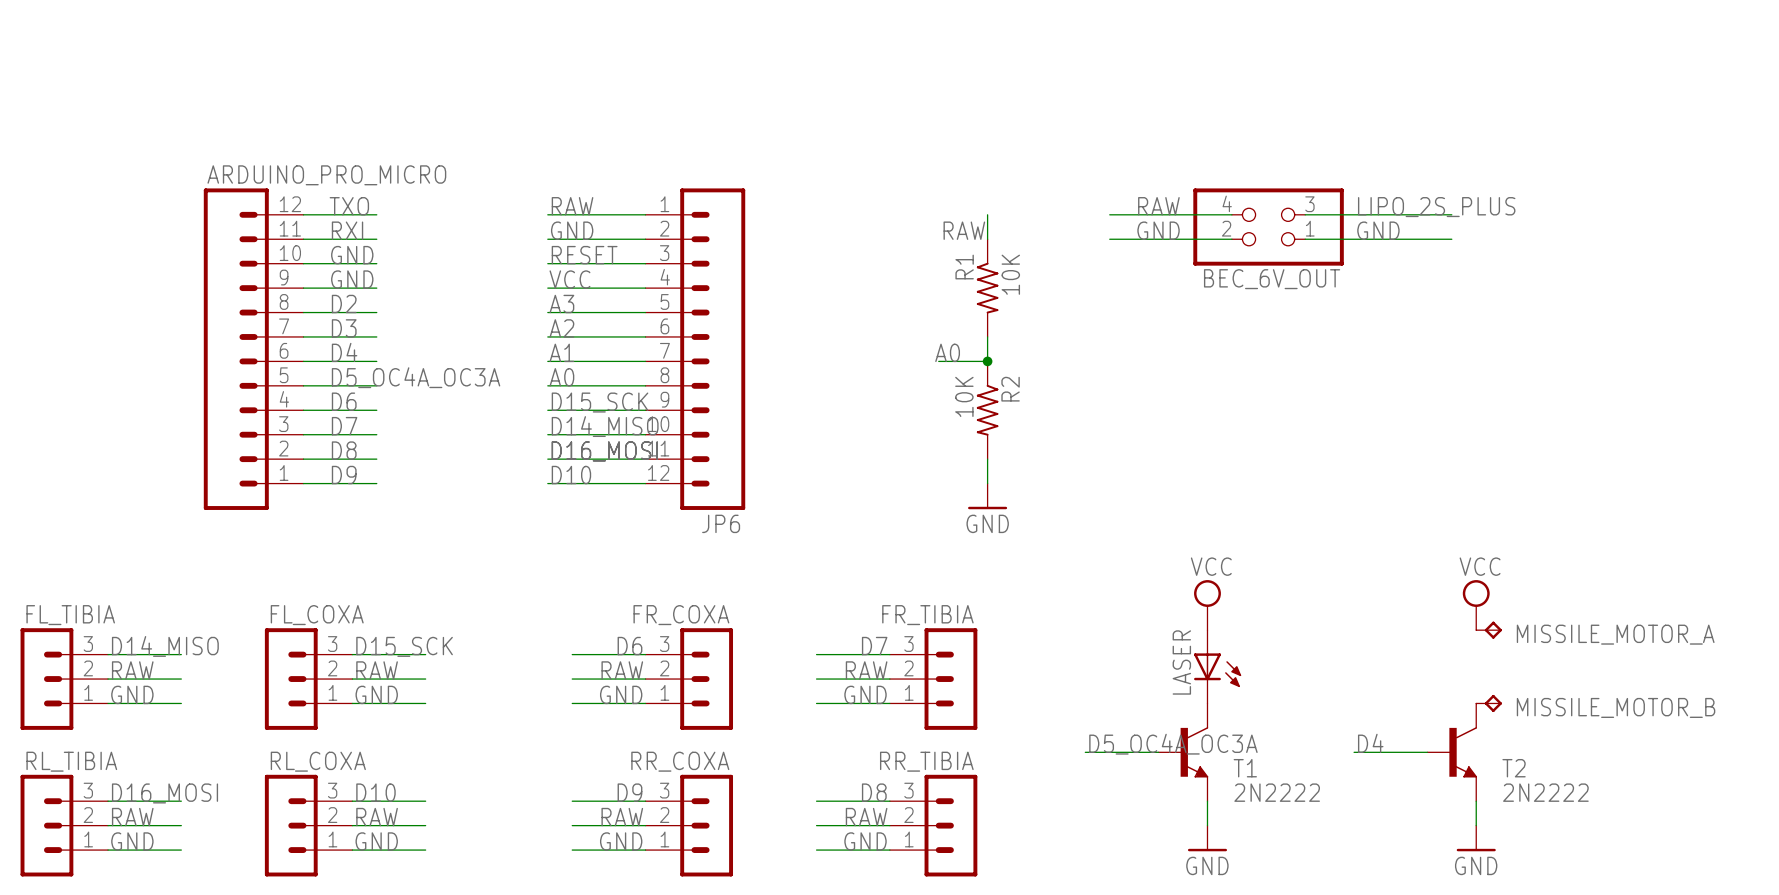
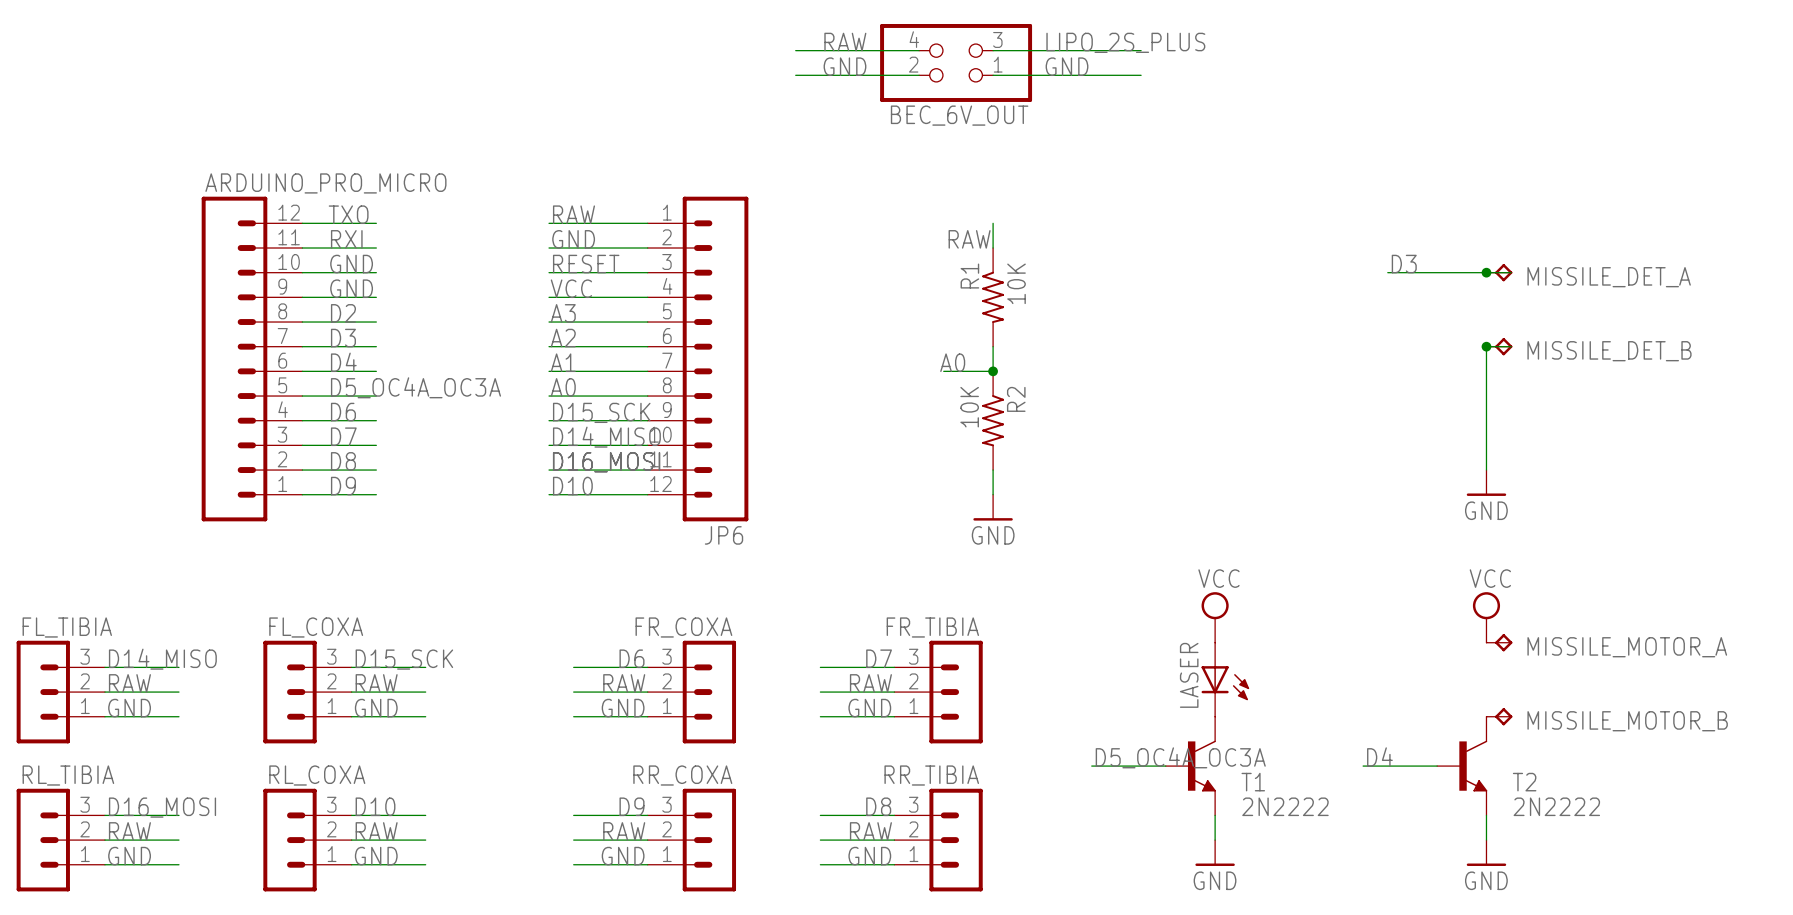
label: none -> RAW (845, 42)
label: none -> LIPO_2S_PLUS (1125, 42)
wire: none -> (795, 50) (919, 50)
wire: none -> (993, 50) (1141, 50)
label: none -> GND (844, 66)
label: none -> GND (1067, 66)
wire: none -> (795, 75) (919, 75)
wire: none -> (993, 75) (1141, 75)
label: RAW (1158, 206) -> none
label: LIPO_2S_PLUS (1436, 207) -> none
wire: (1109, 214) (1231, 214) -> none
wire: (1305, 214) (1451, 214) -> none
BEC_6V_OUT position: (1268, 227) -> (956, 62)
label: GND (1158, 230) -> none
label: GND (1378, 230) -> none
wire: (1109, 239) (1231, 239) -> none
wire: (1305, 239) (1451, 239) -> none
label: none -> D3 (1404, 264)
wire: none -> (1387, 272) (1511, 272)
junction: none -> (1486, 272)
MISSILE_DET_A: none -> (1499, 272)
junction: none -> (1486, 346)
MISSILE_DET_B: none -> (1499, 346)
wire: none -> (1511, 346) (1486, 346) (1486, 470)
power symbol: none -> GND (1486, 482)

